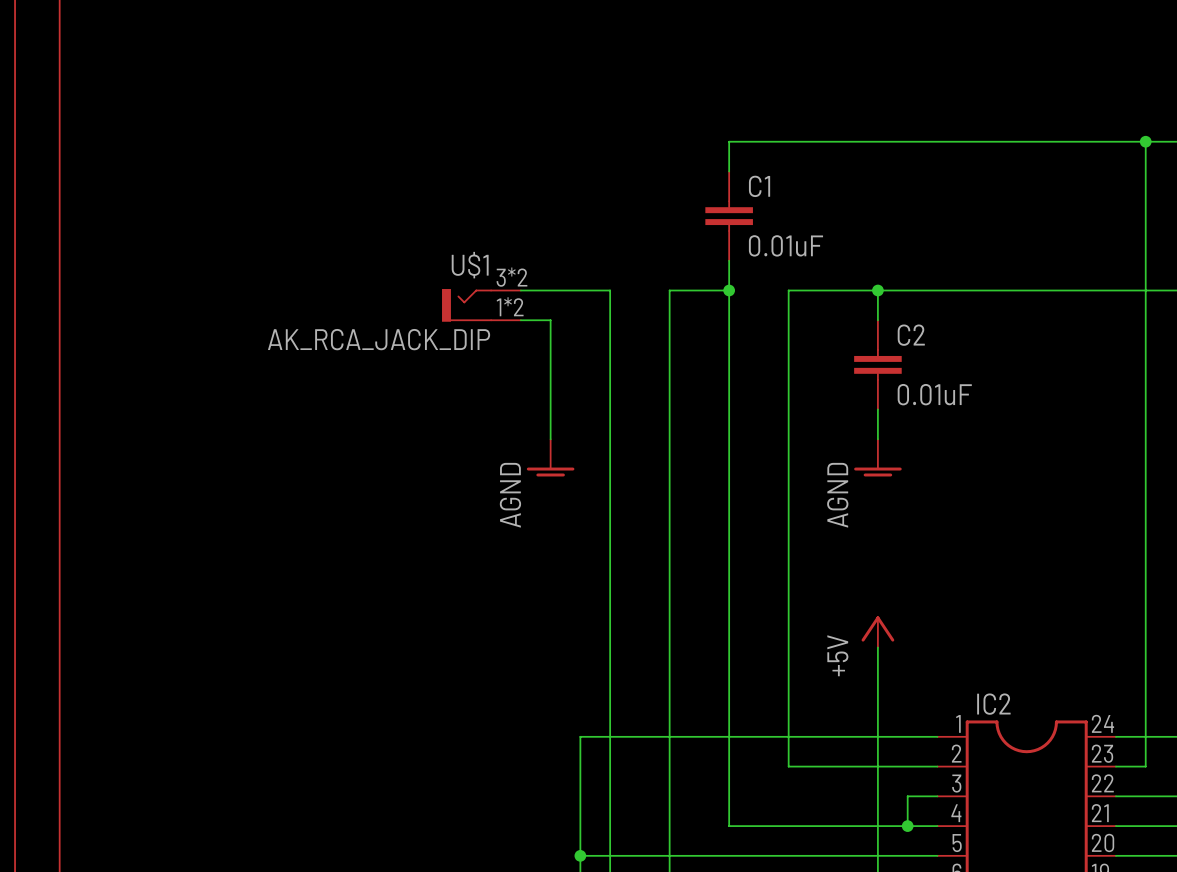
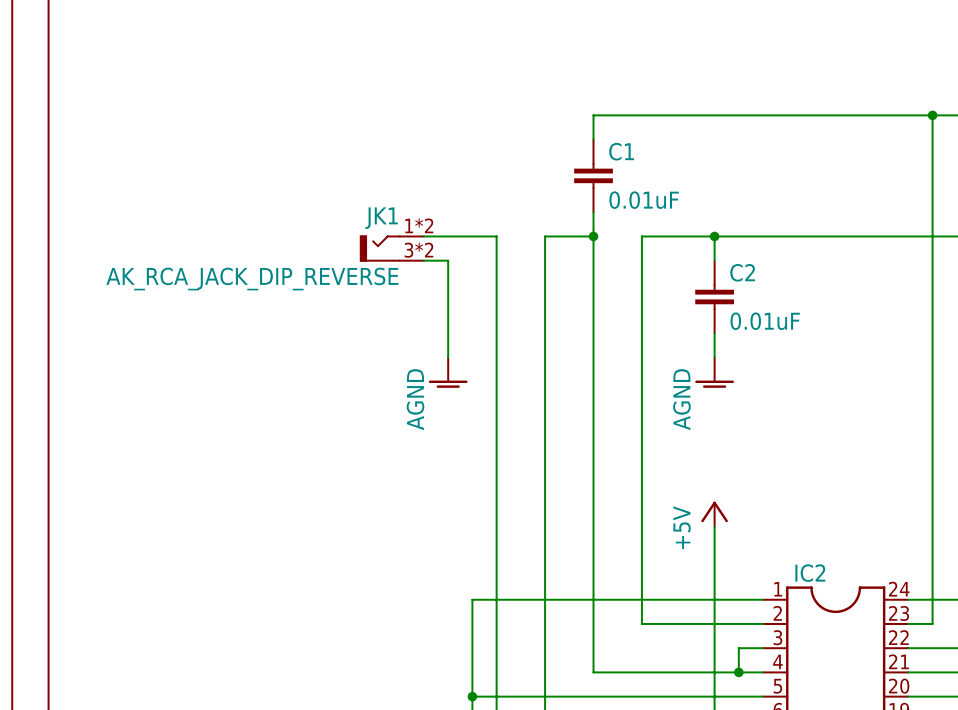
U$1 name: U$1 (470, 265) -> JK1 (381, 218)
U$1 pin number: 3*2 (511, 277) -> 1*2 (419, 225)
U$1 pin number: 1*2 (510, 306) -> 3*2 (418, 250)
U$1 value: AK_RCA_JACK_DIP (379, 339) -> AK_RCA_JACK_DIP_REVERSE (252, 279)

